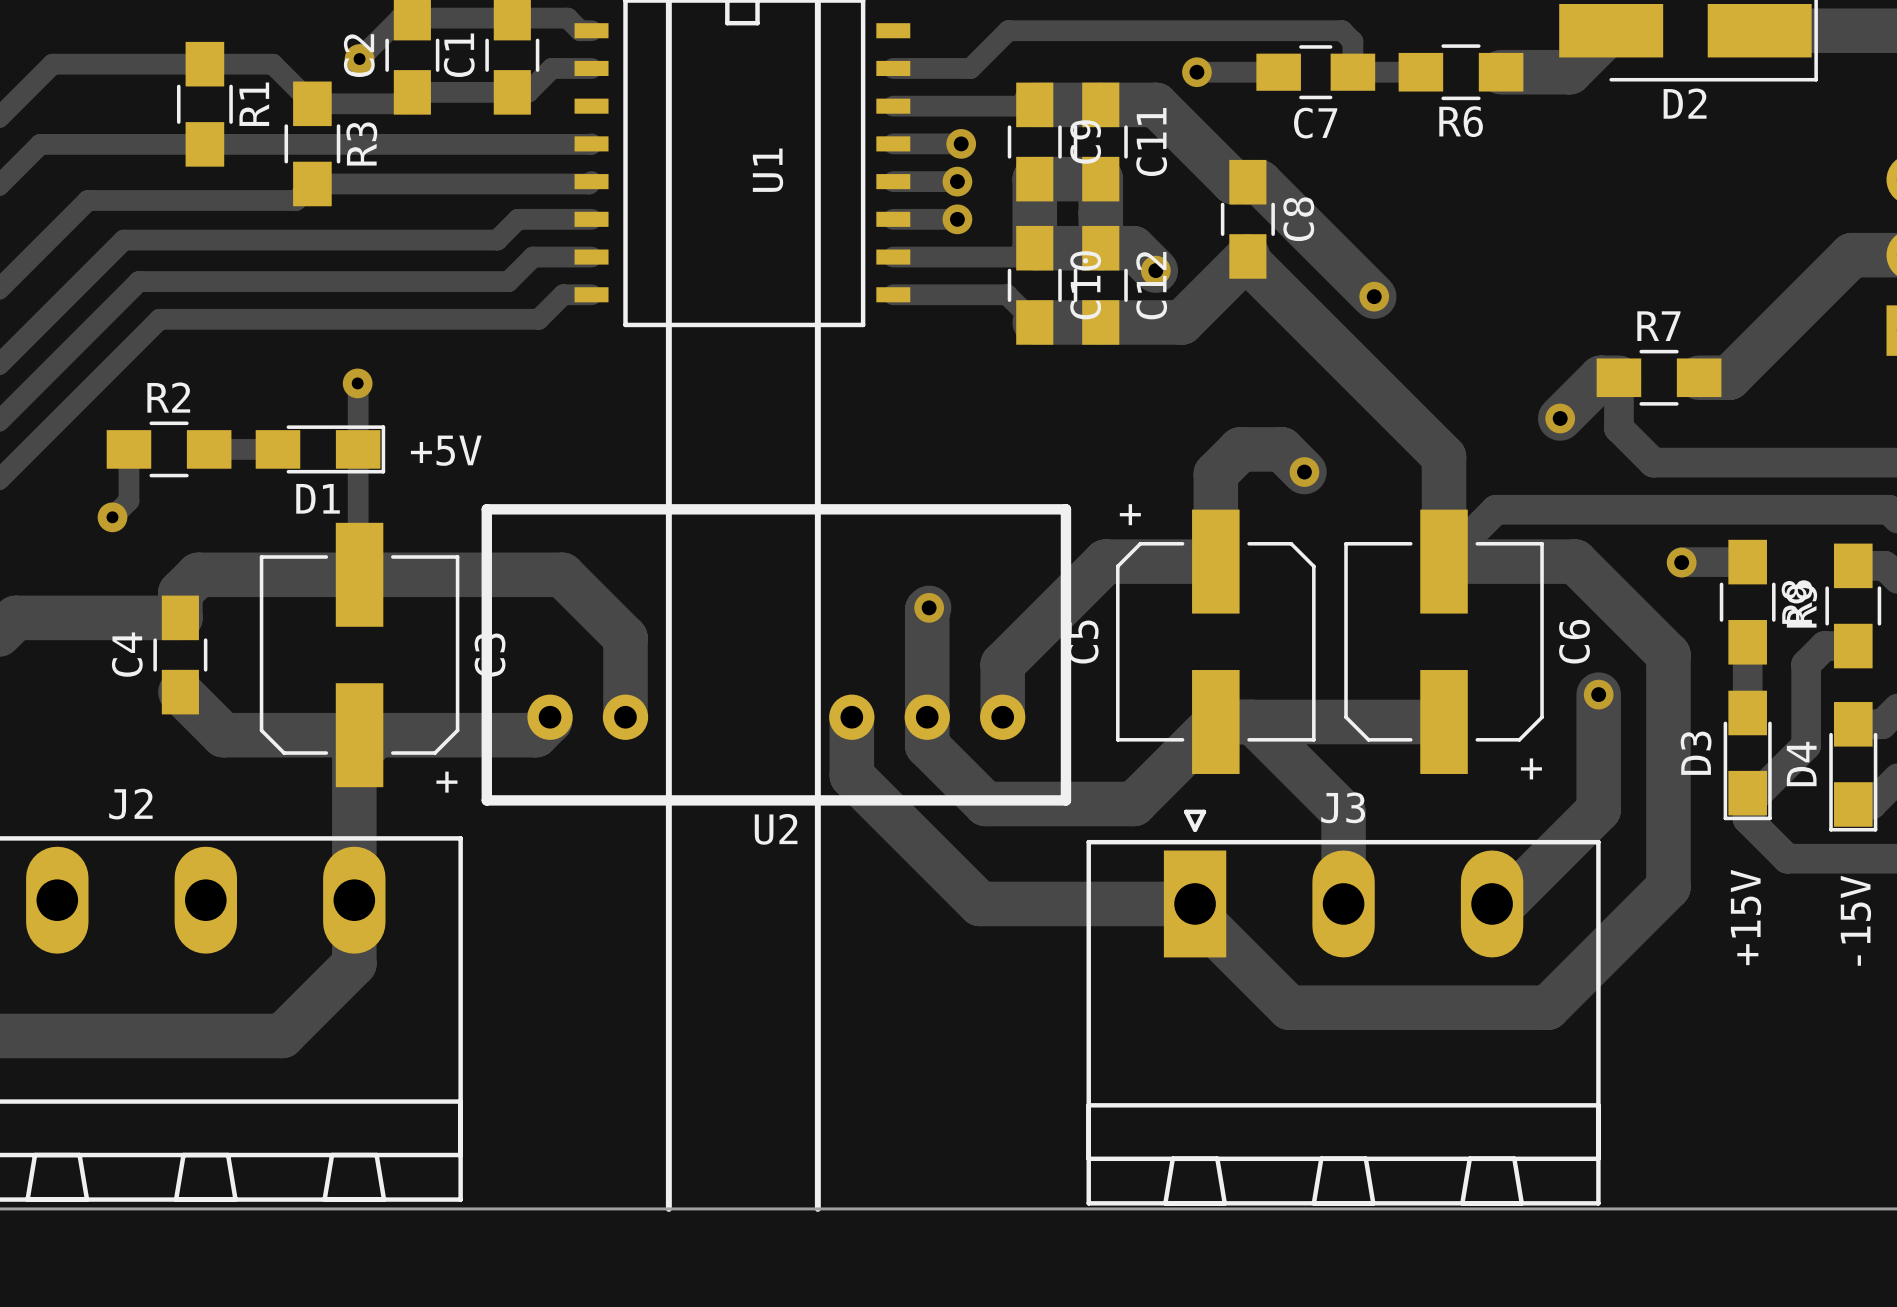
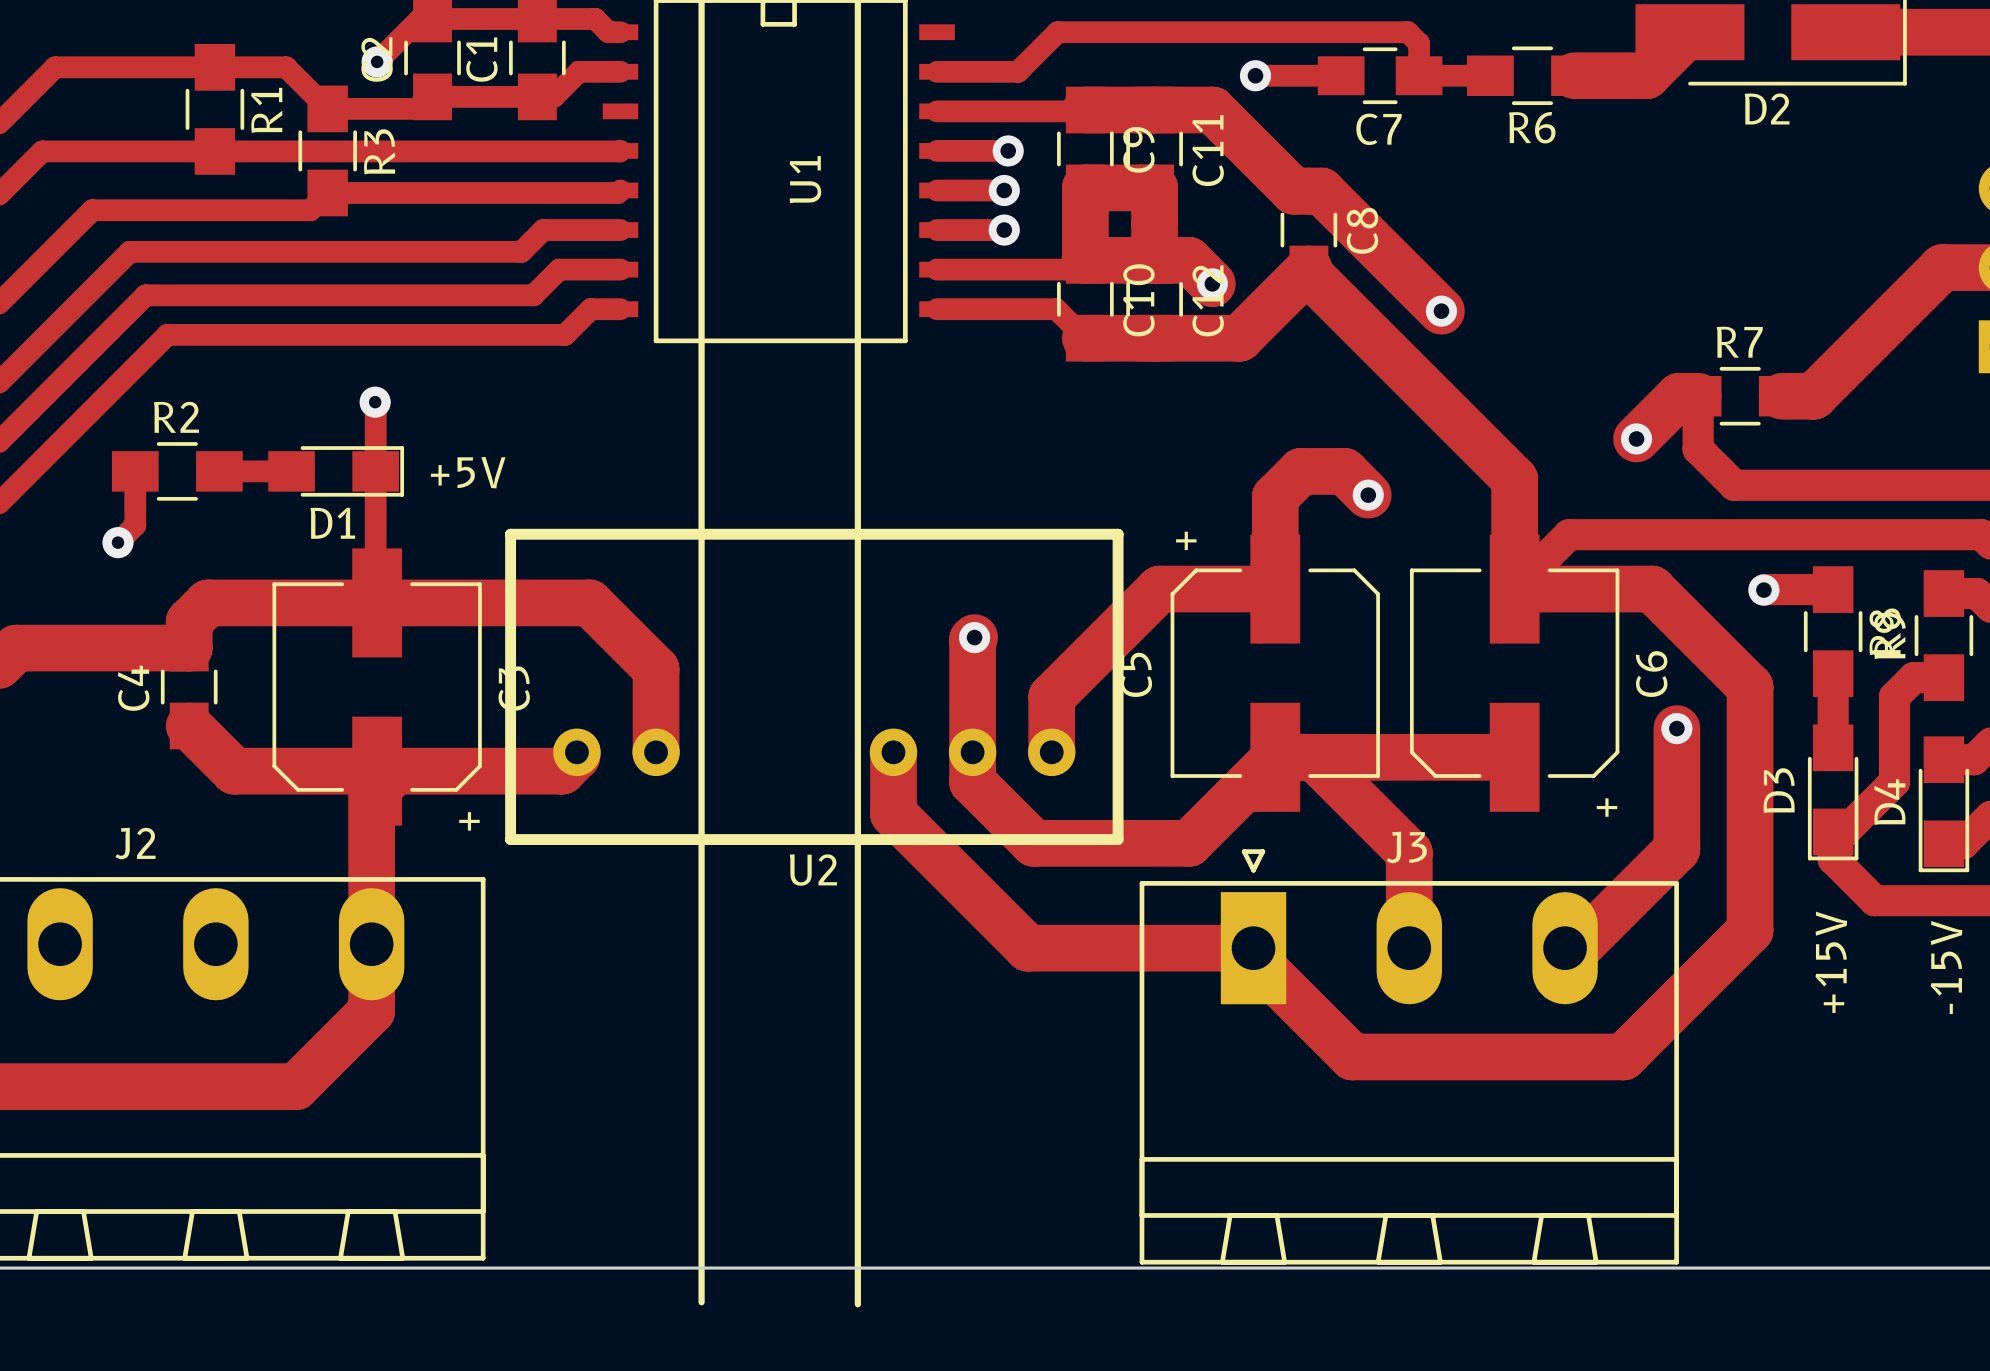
line: none -> (701, 1268) (701, 1302)
line: none -> (857, 1268) (857, 1304)

